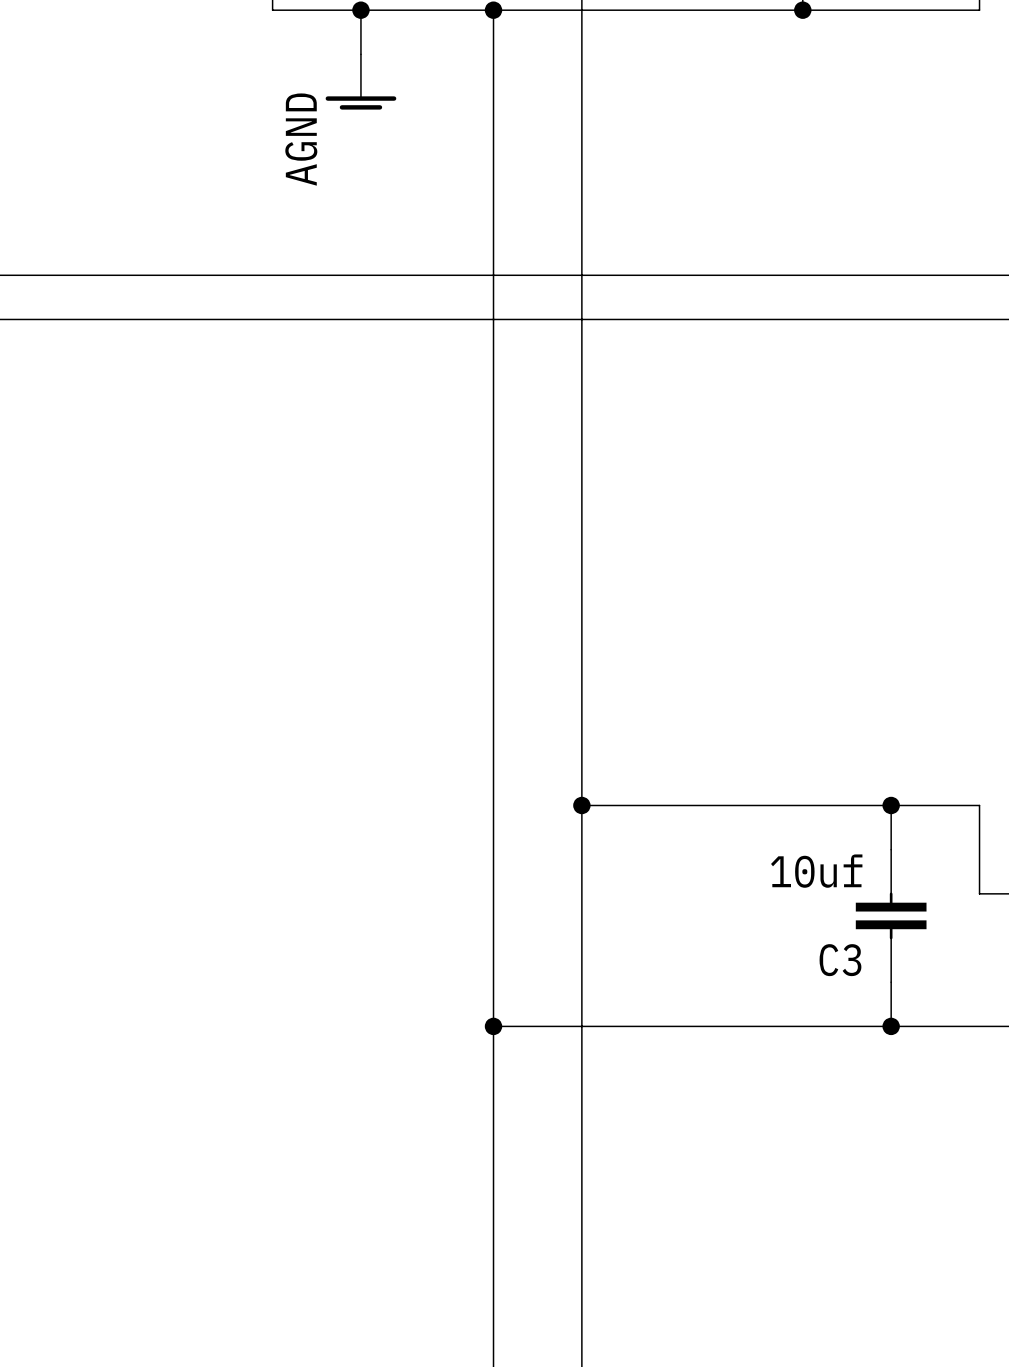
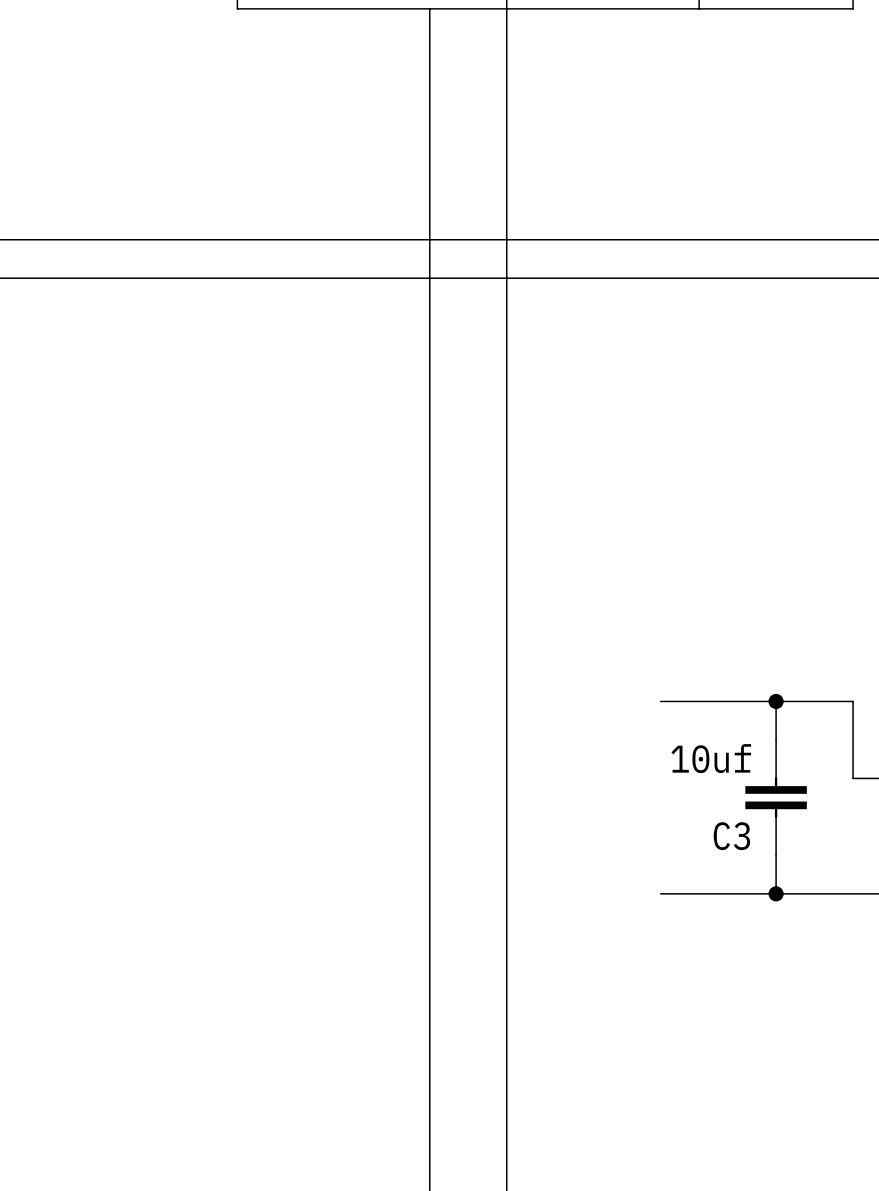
wire: (360, 10) (360, 54) -> none
junction: (360, 10) -> none
junction: (493, 10) -> none
junction: (802, 10) -> none
power symbol: AGND (360, 81) -> none
wire: (581, 805) (758, 805) -> none
junction: (581, 805) -> none
wire: (493, 1026) (758, 1026) -> none
junction: (493, 1026) -> none

